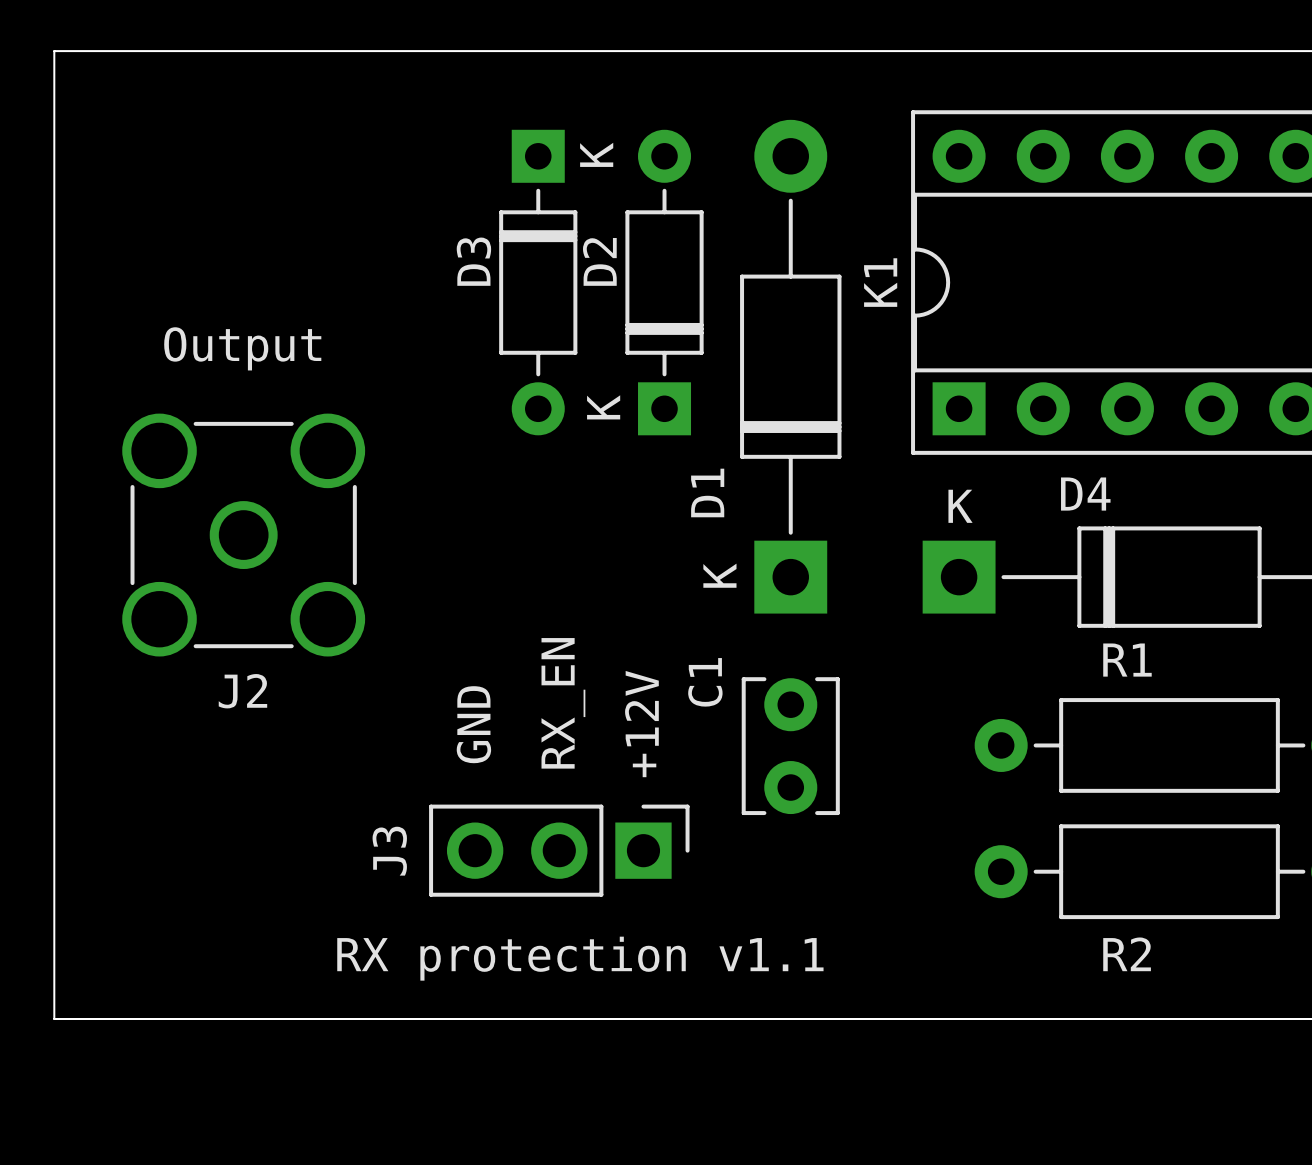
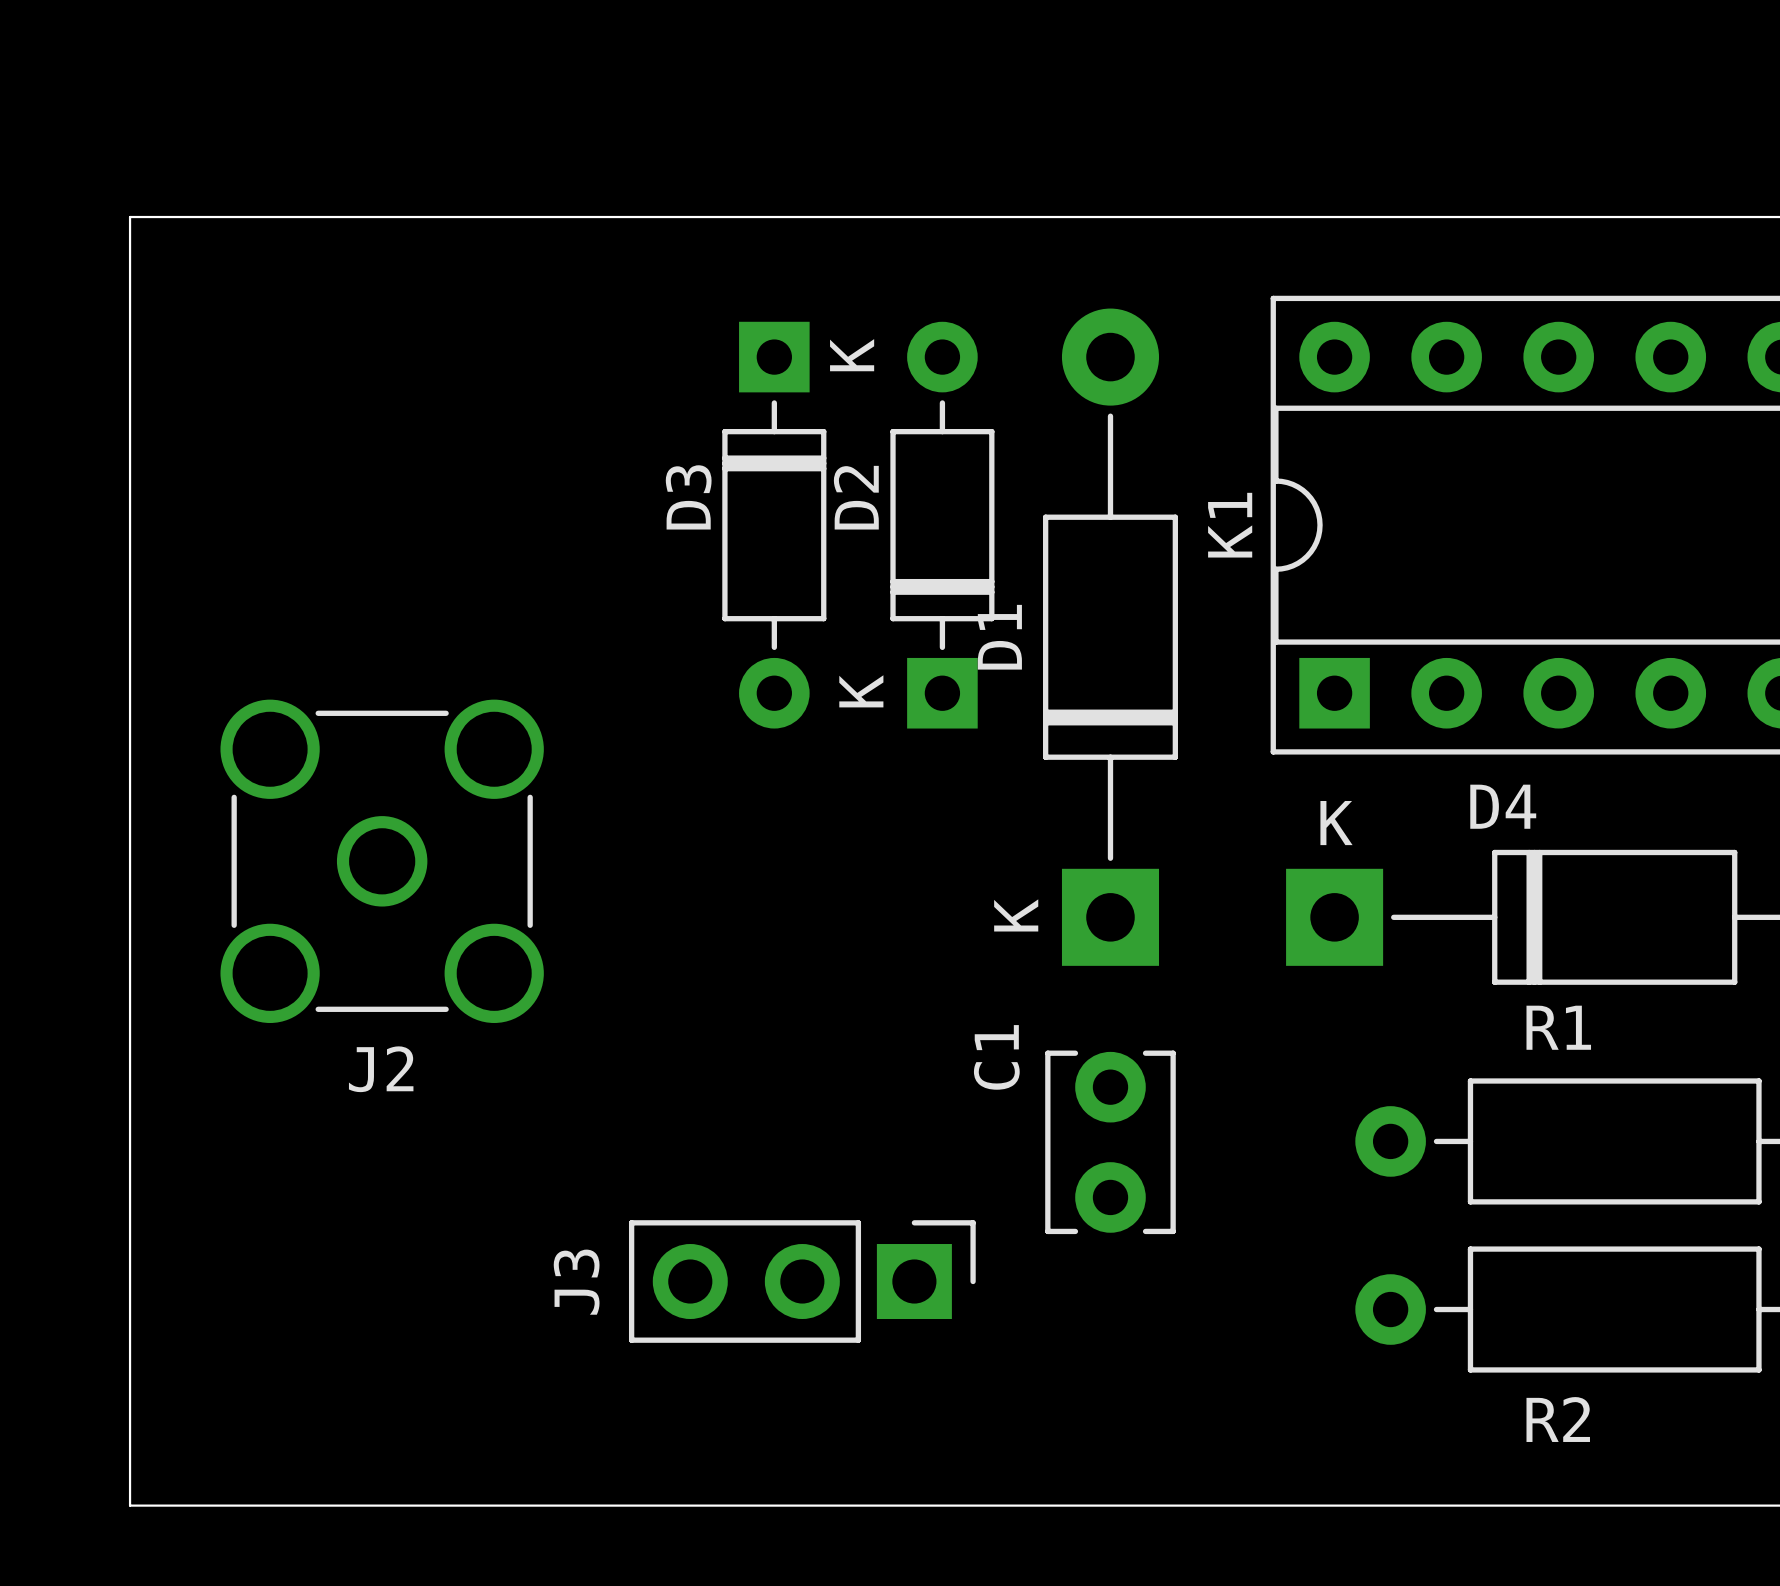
text: Output (242, 348) -> none
D1 name position: D1 (707, 492) -> D1 (999, 637)
text: RX_EN (563, 703) -> none
text: GND (473, 724) -> none
text: +12V (641, 724) -> none
text: RX protection v1.1 (580, 958) -> none

